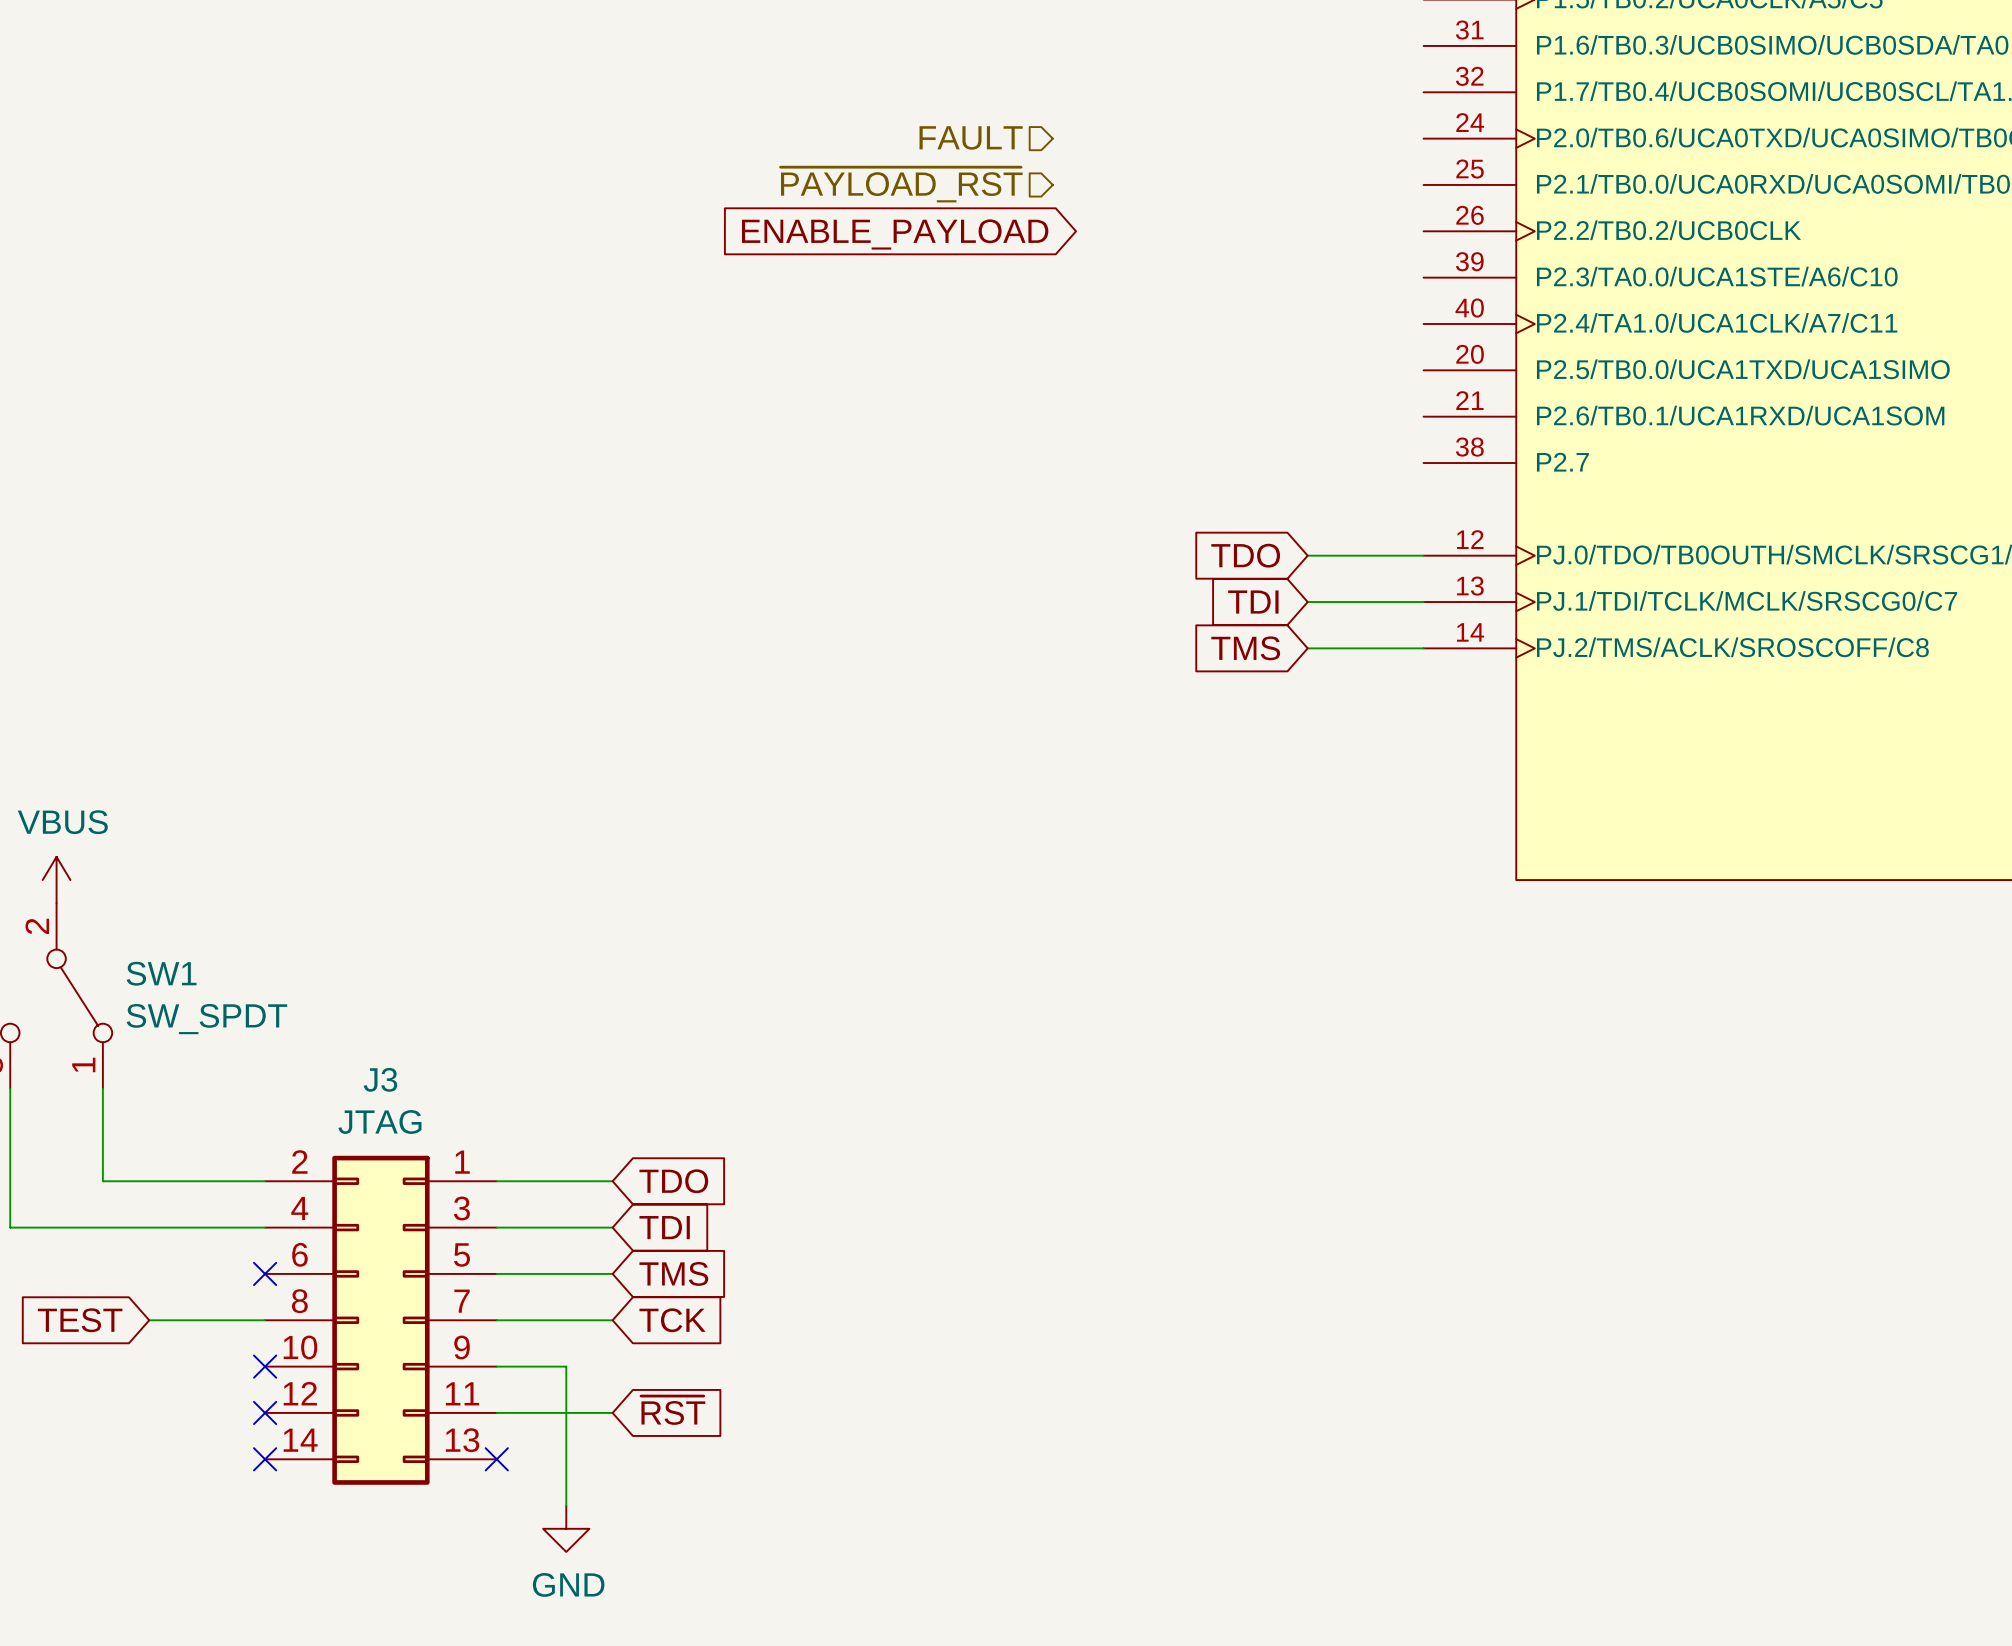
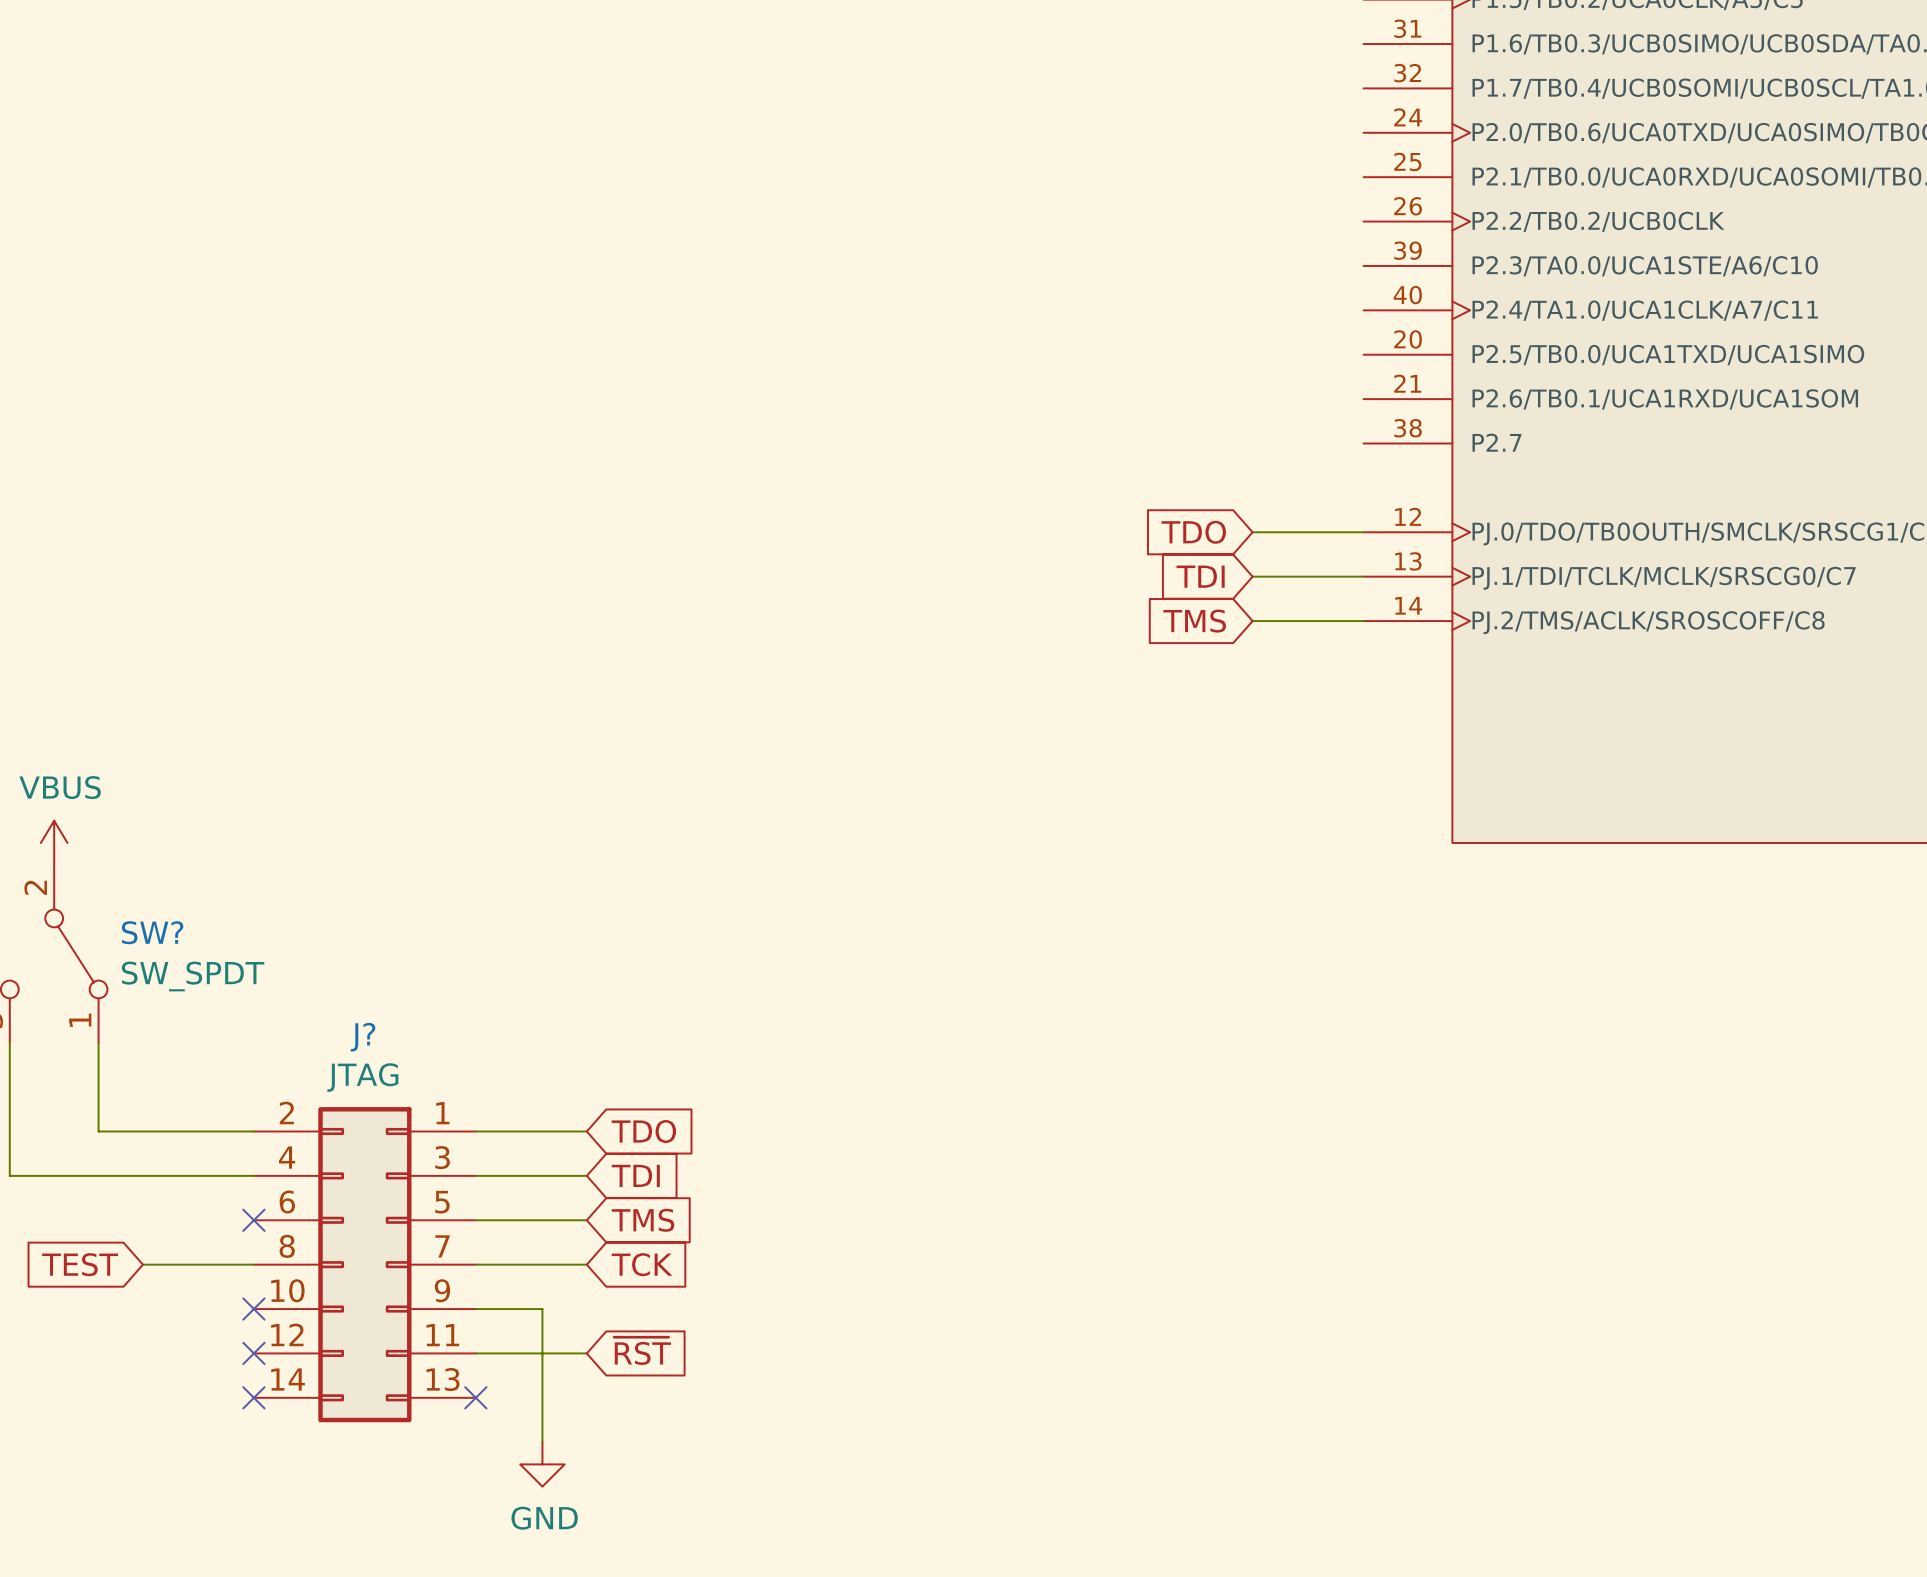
hierarchical label: FAULT (971, 137) -> none
hierarchical label: ~{PAYLOAD_RST} (901, 184) -> none
global label: ENABLE_PAYLOAD (895, 234) -> none
SW1 name: SW1 (161, 973) -> SW? (152, 932)
J3 name: J3 (380, 1079) -> J? (363, 1037)

